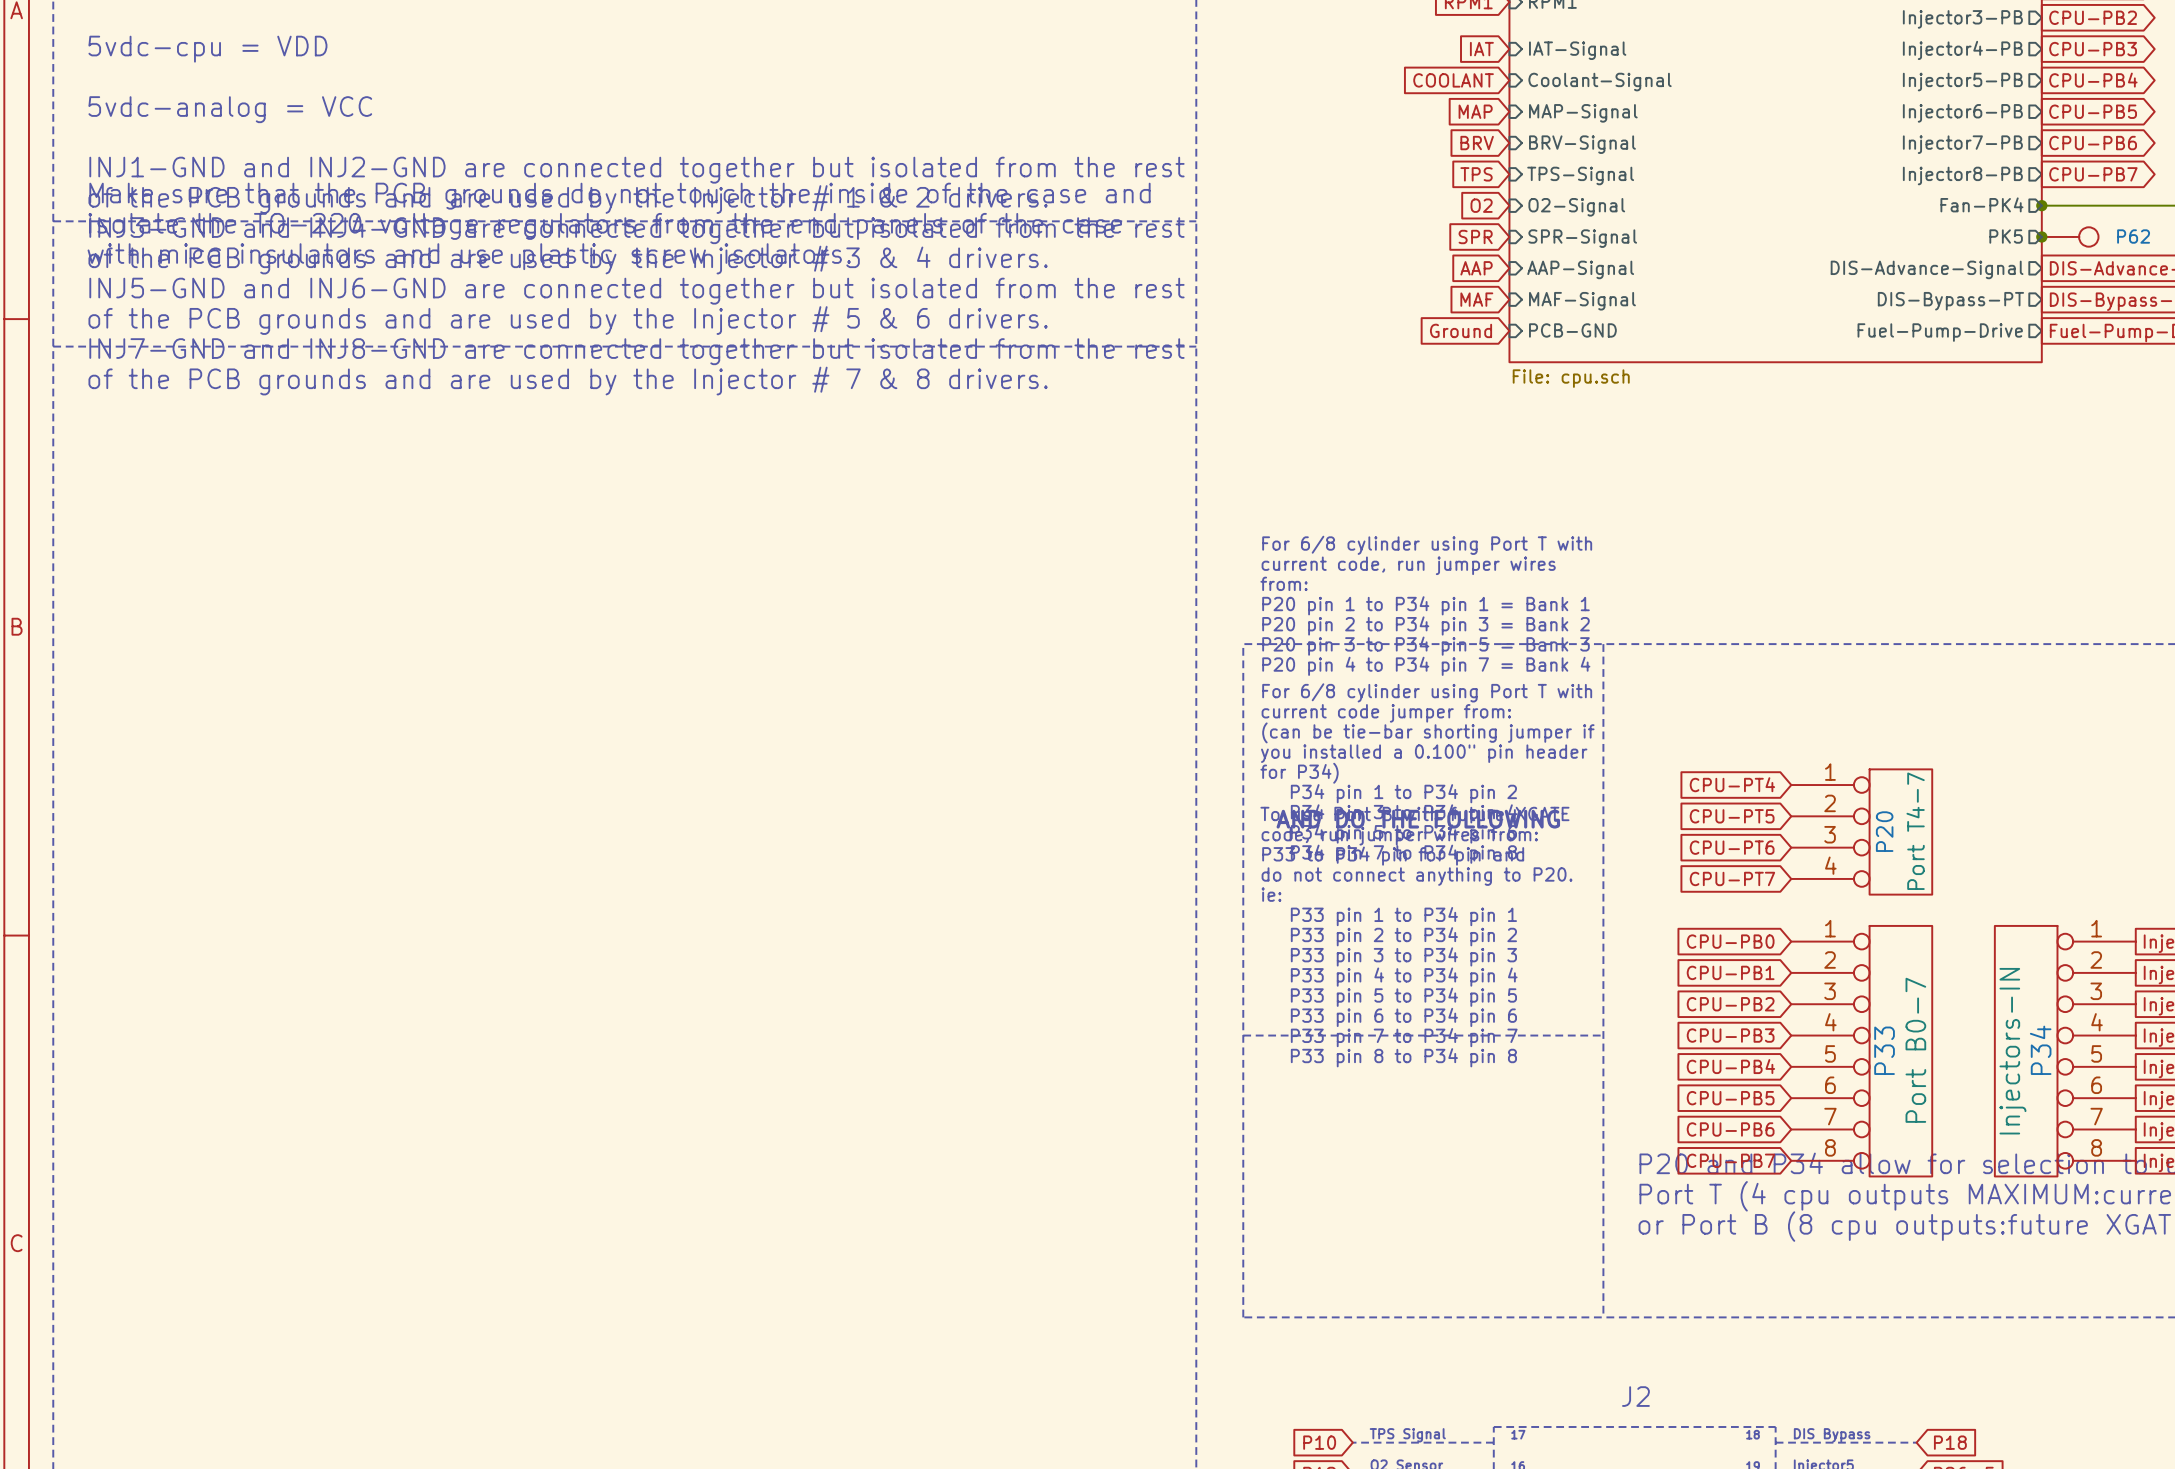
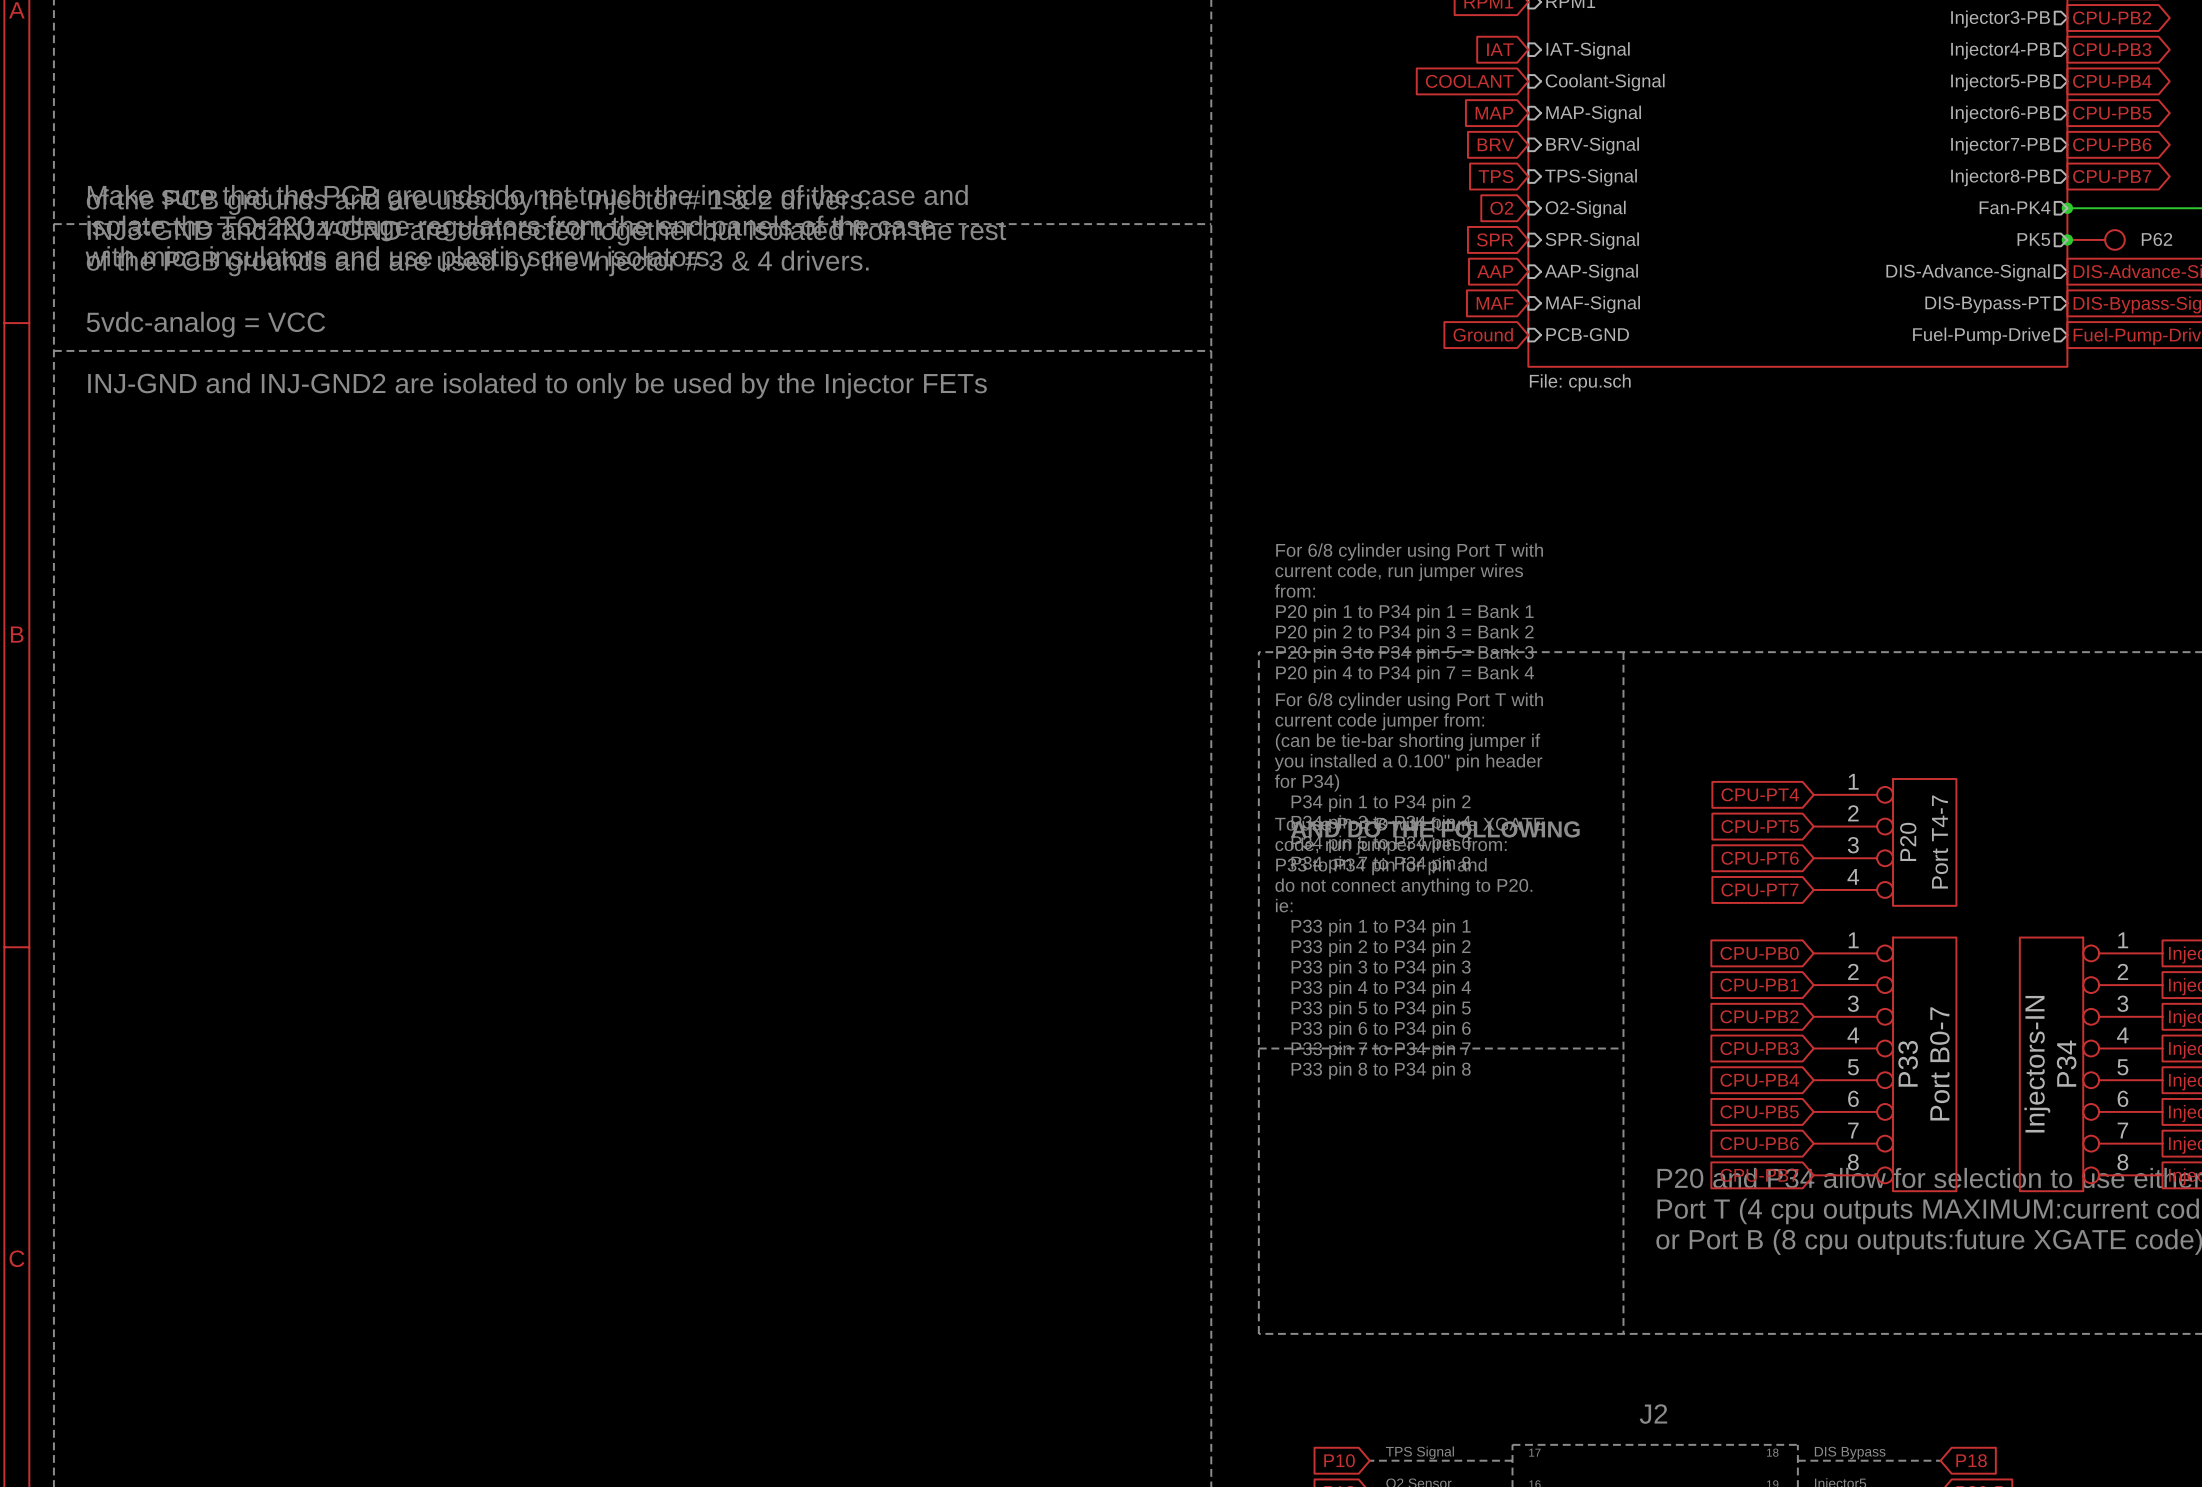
text: 5vdc-cpu = VDD (207, 49) -> none
text: 5vdc-analog = VCC (230, 109) -> none
text: INJ1-GND and INJ2-GND are connected together but isolated from the rest (636, 170) -> none
text: INJ5-GND and INJ6-GND are connected together but isolated from the rest (636, 291) -> none
text: of the PCB grounds and are used by the Injector # 5 & 6 drivers. (568, 320) -> 5vdc-analog = VCC (205, 324)
text: INJ7-GND and INJ8-GND are connected together but isolated from the rest (636, 351) -> none
text: of the PCB grounds and are used by the Injector # 7 & 8 drivers. (568, 381) -> INJ-GND and INJ-GND2 are isolated to only be used by the Injector FETs (537, 385)

